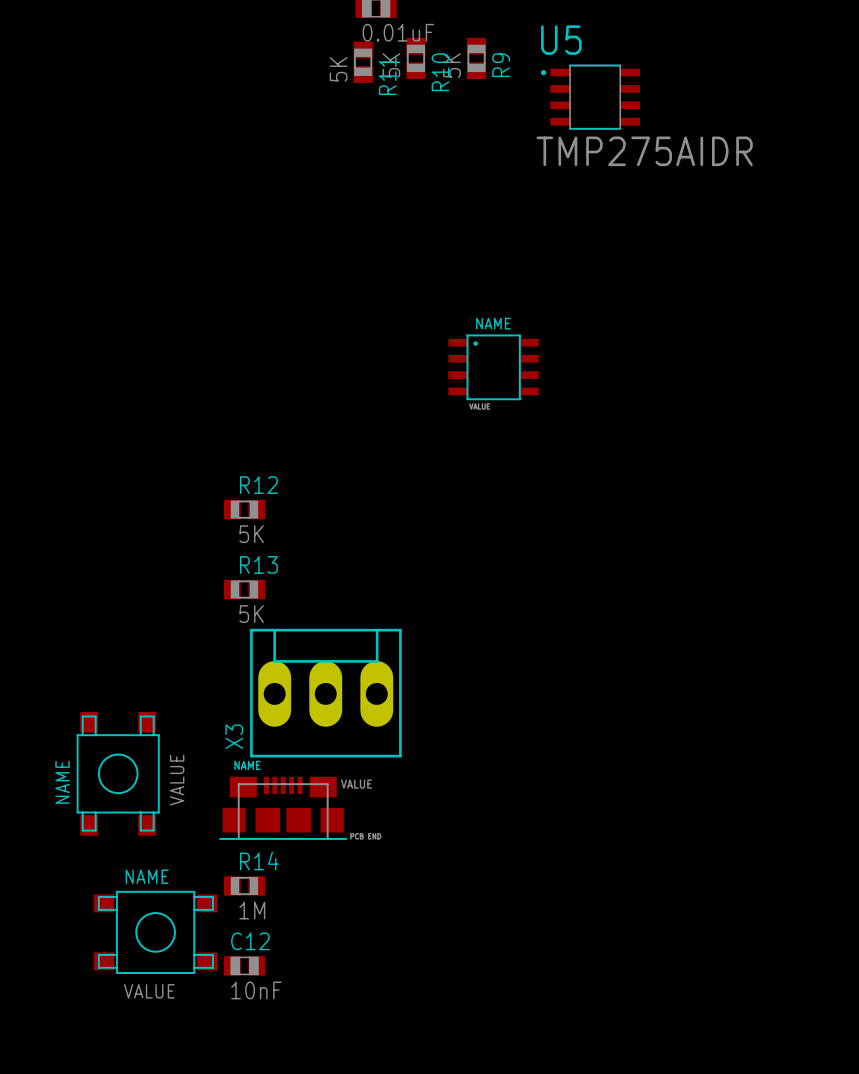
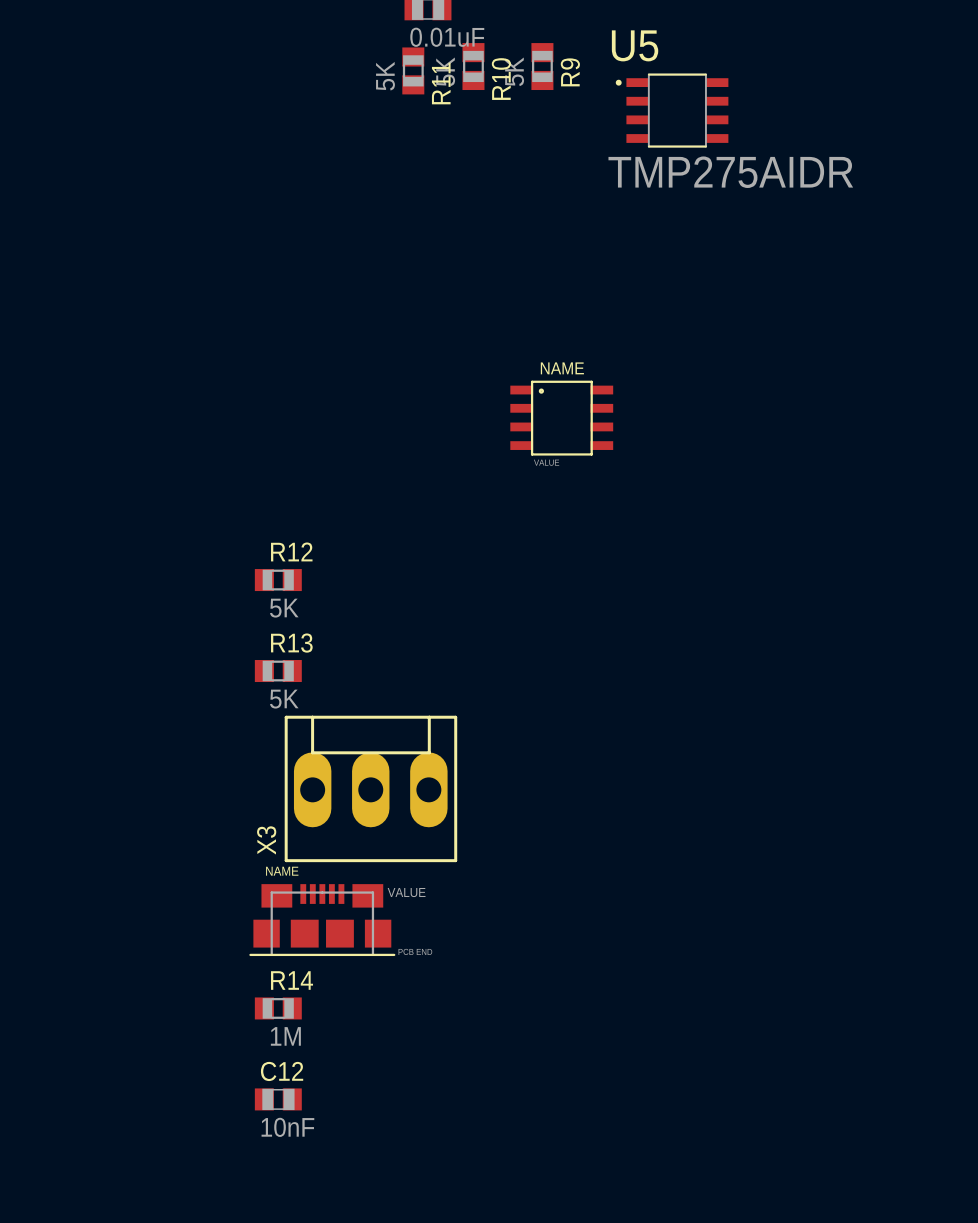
part: (118, 773) -> none
part: (155, 932) -> none

